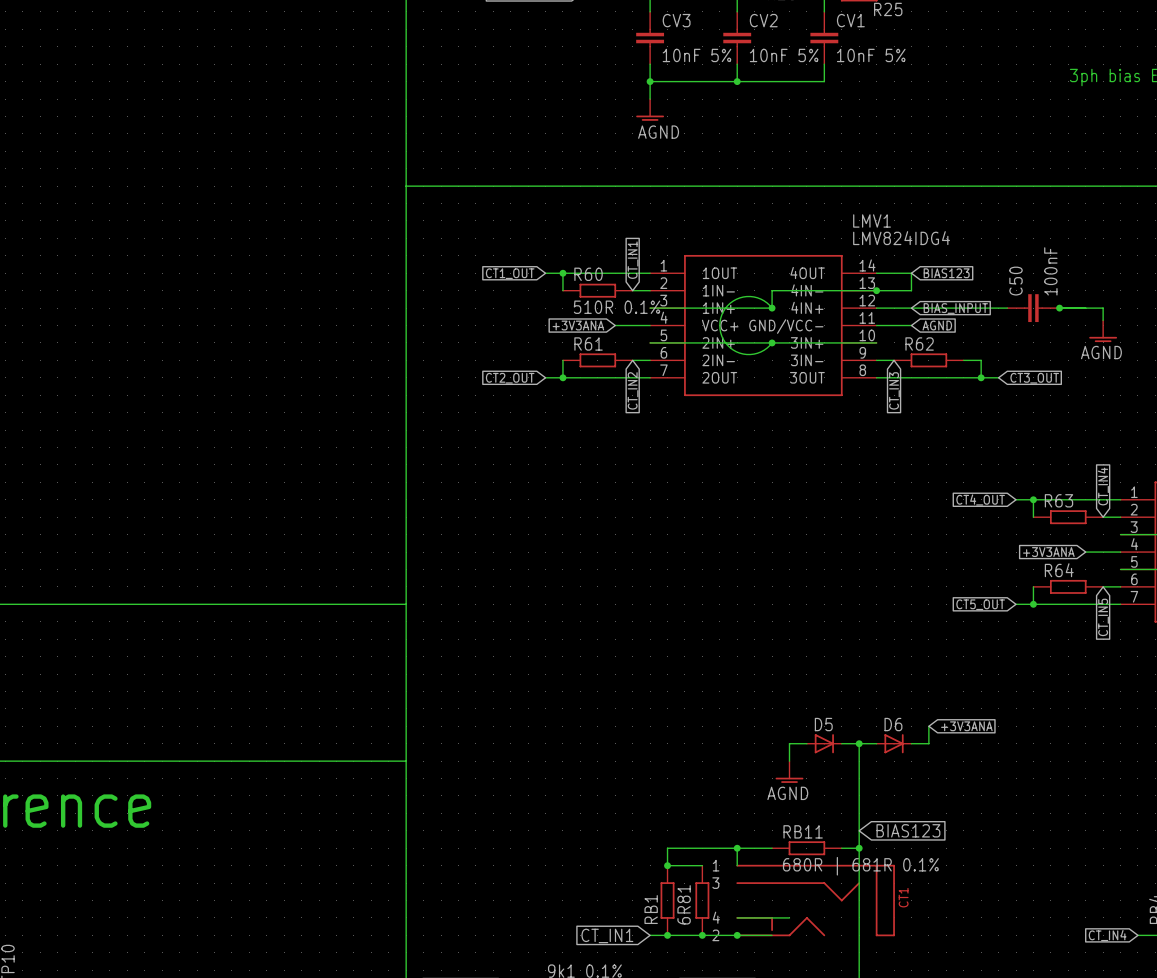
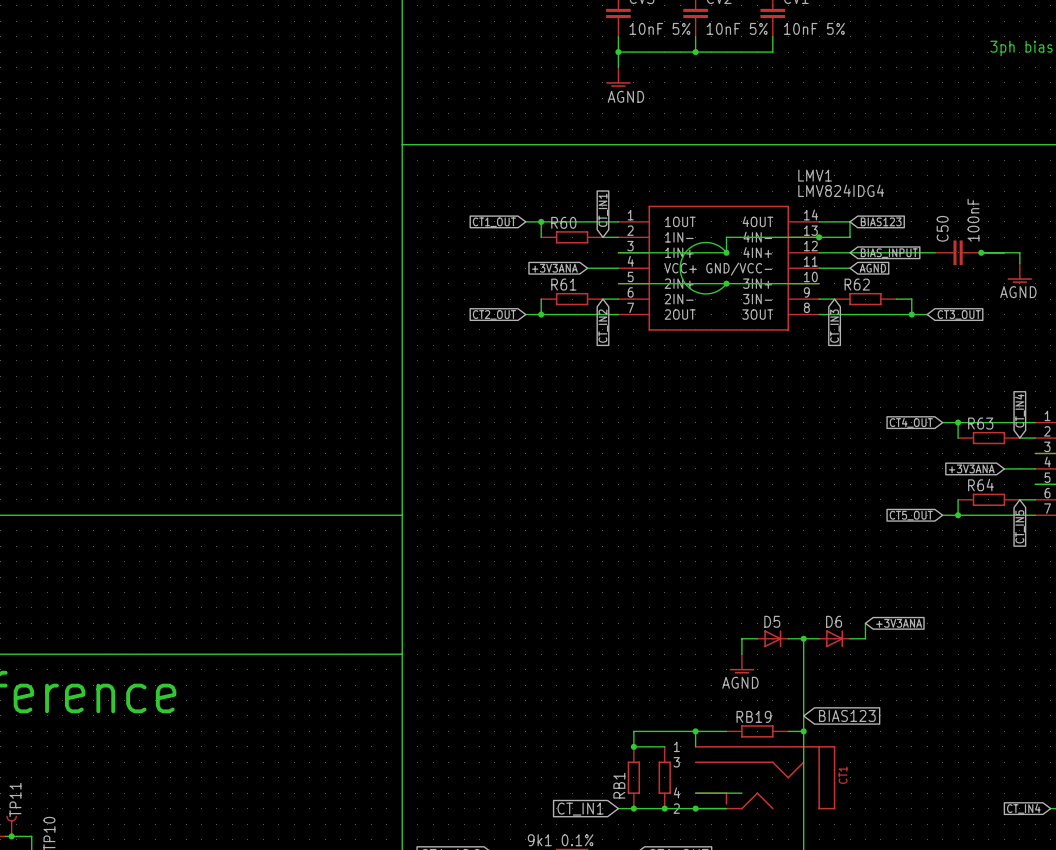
R60 value: 510R 0.1% (617, 307) -> none
RB11 name: RB11 (803, 831) -> RB19 (754, 716)
RB11 value: 680R | 681R 0.1% (860, 866) -> none
RB1 value: 6R81 (684, 904) -> none

